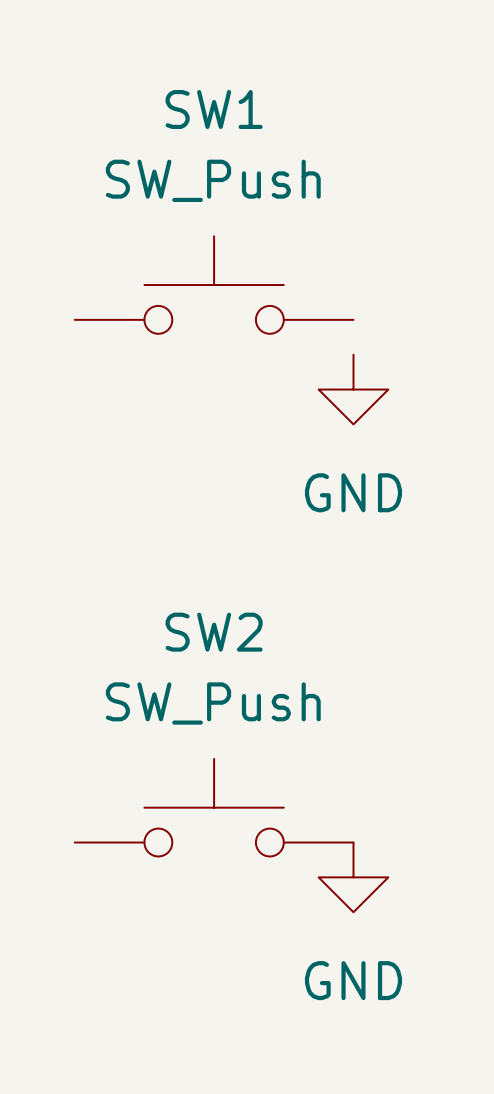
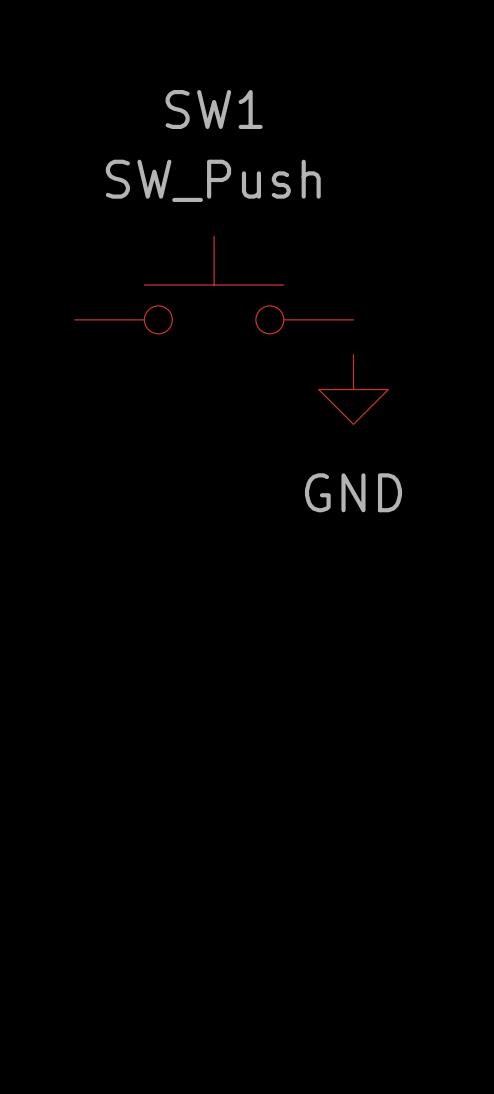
SW2: SW_Push (214, 807) -> none
power symbol: GND (353, 877) -> none

